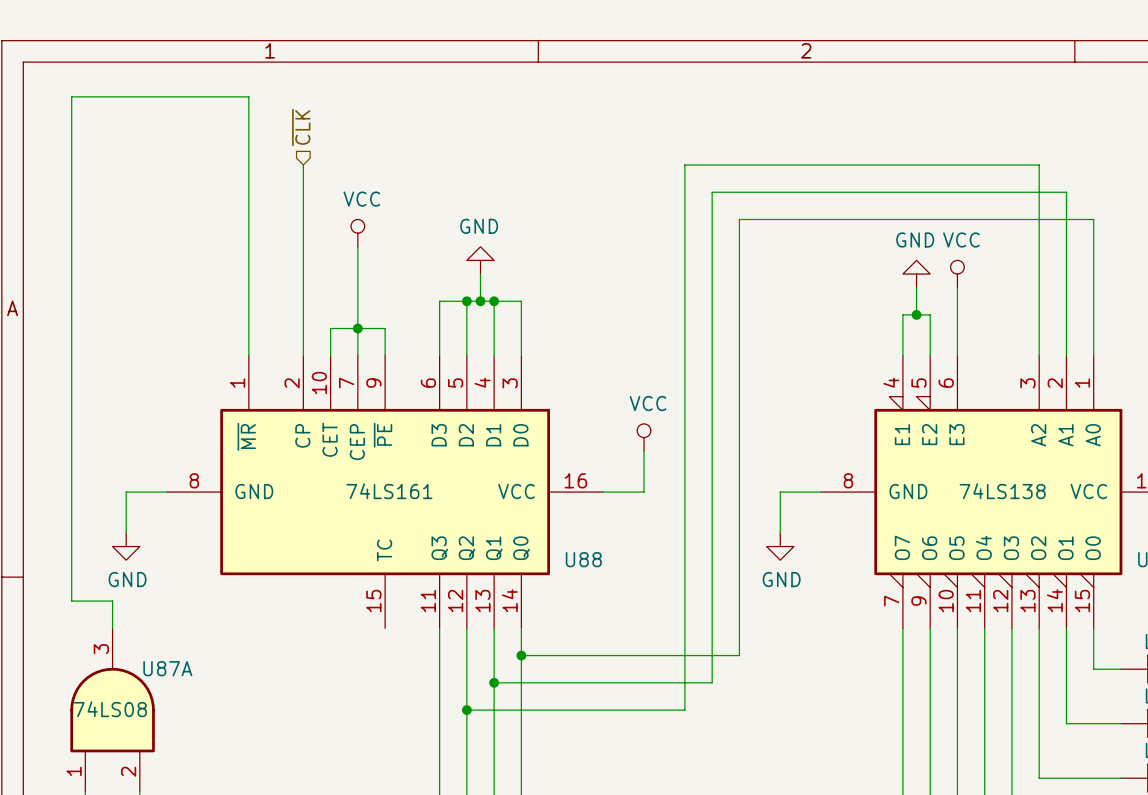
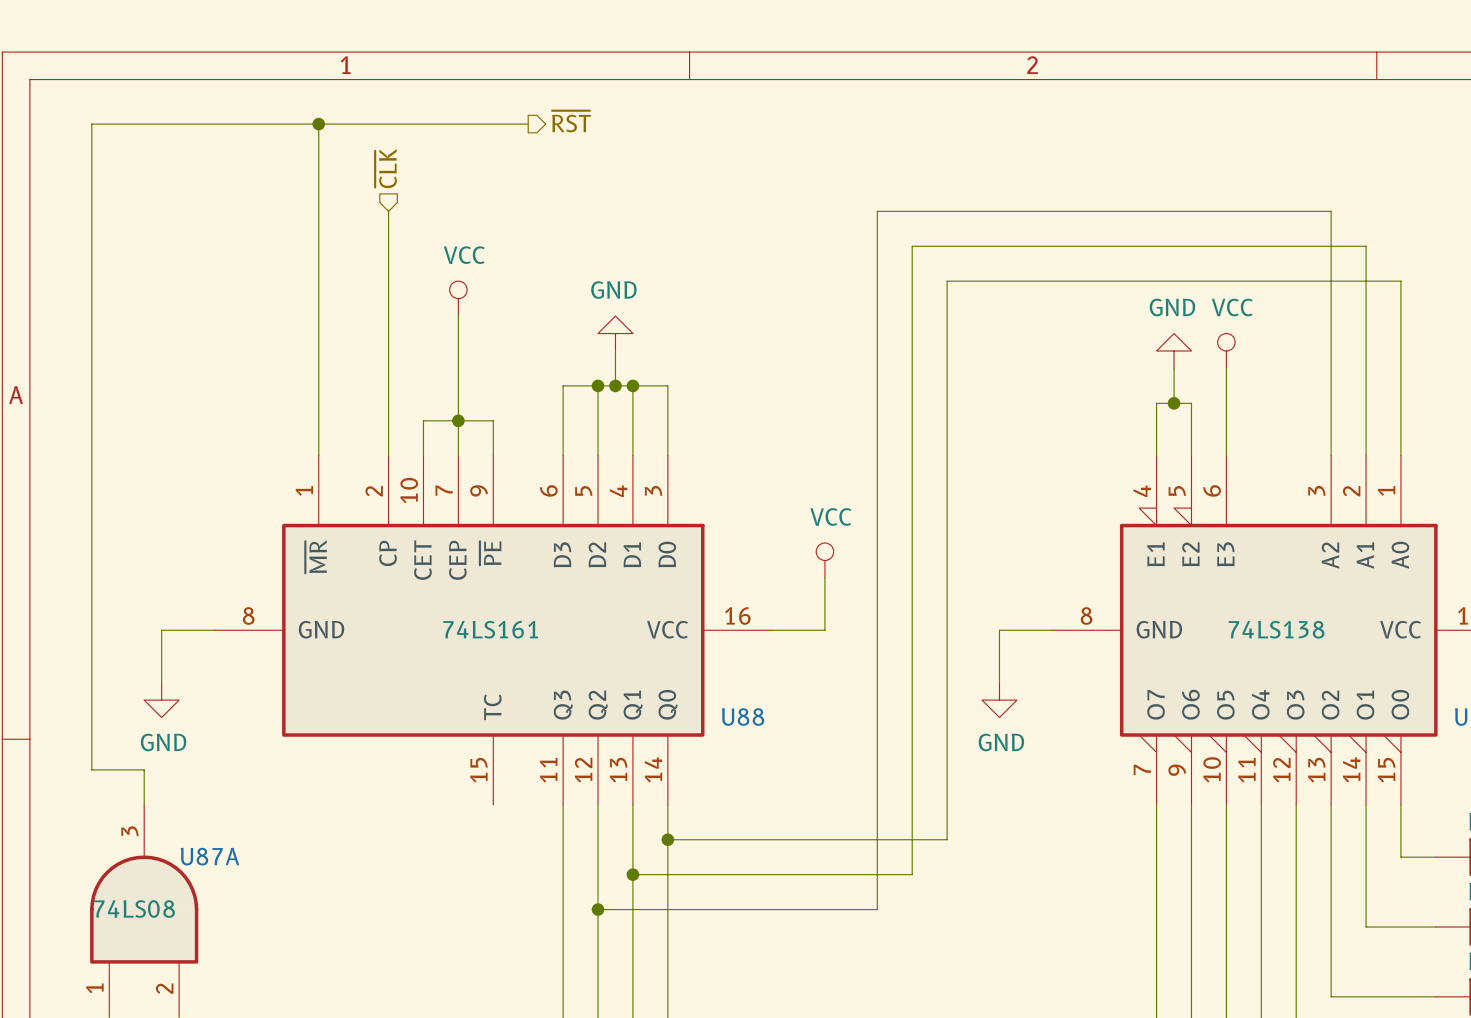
hierarchical label: none -> ~{RST} (571, 121)
wire: none -> (318, 124) (528, 124)
junction: none -> (318, 124)

